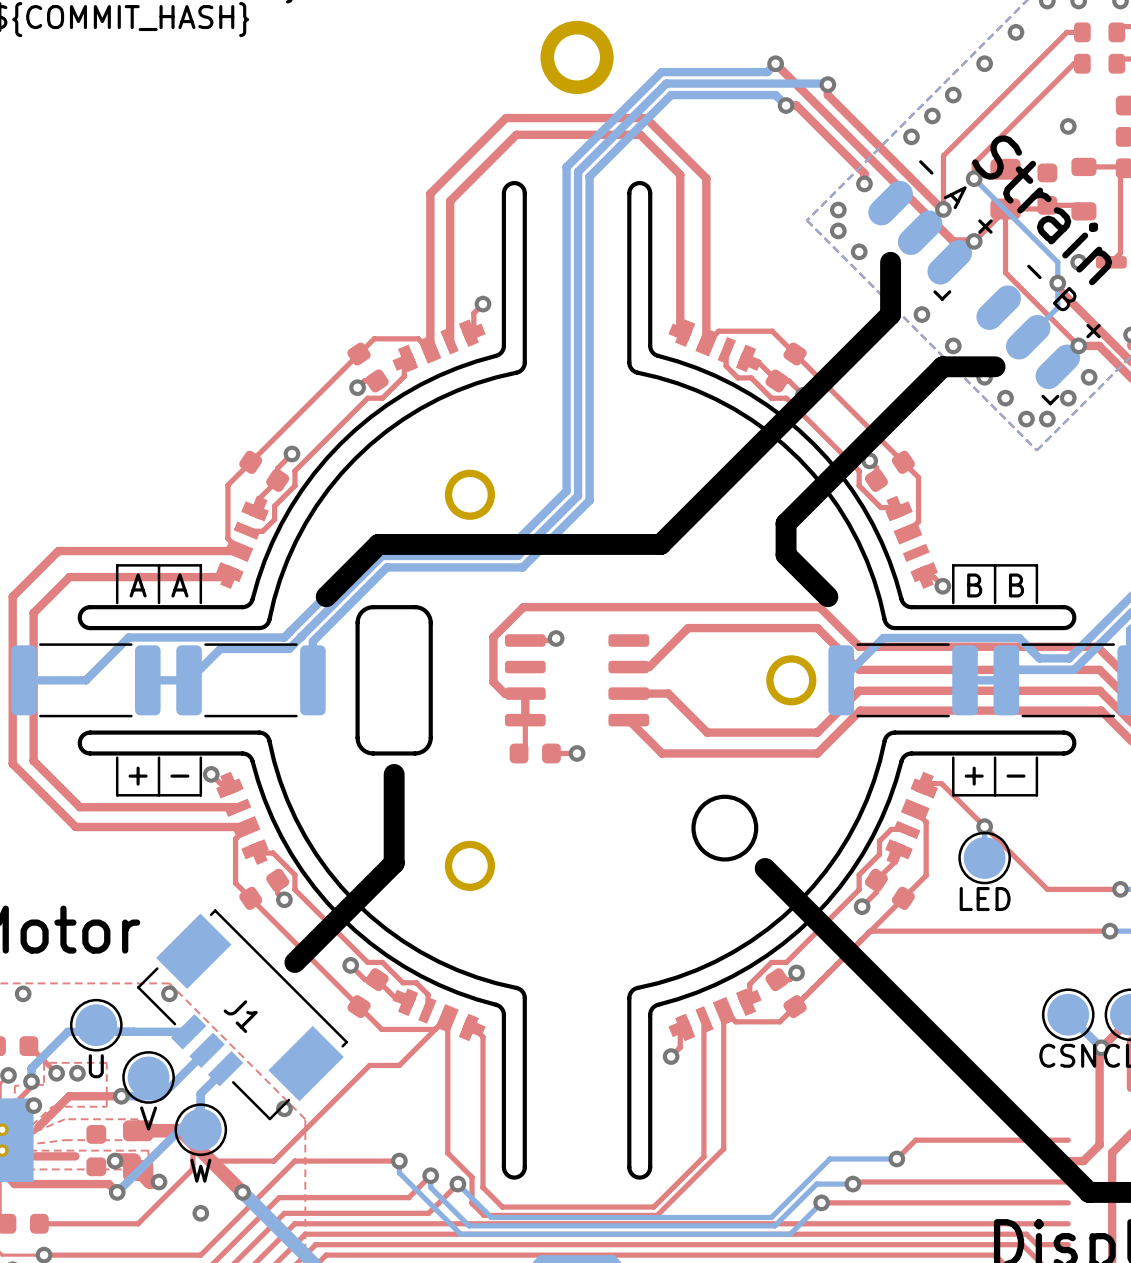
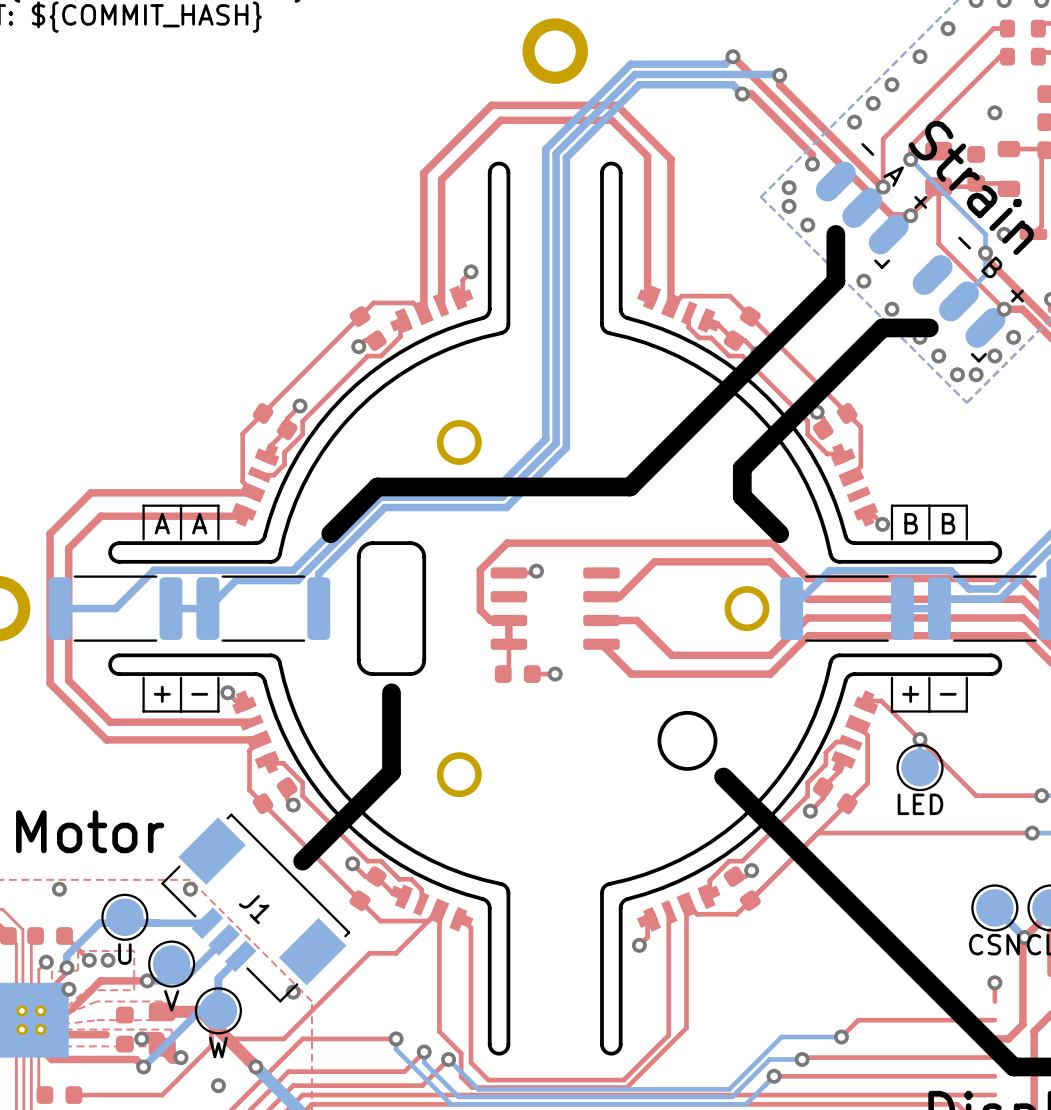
top track: none -> (994, 982) (994, 1001)
via: none -> (994, 982)

